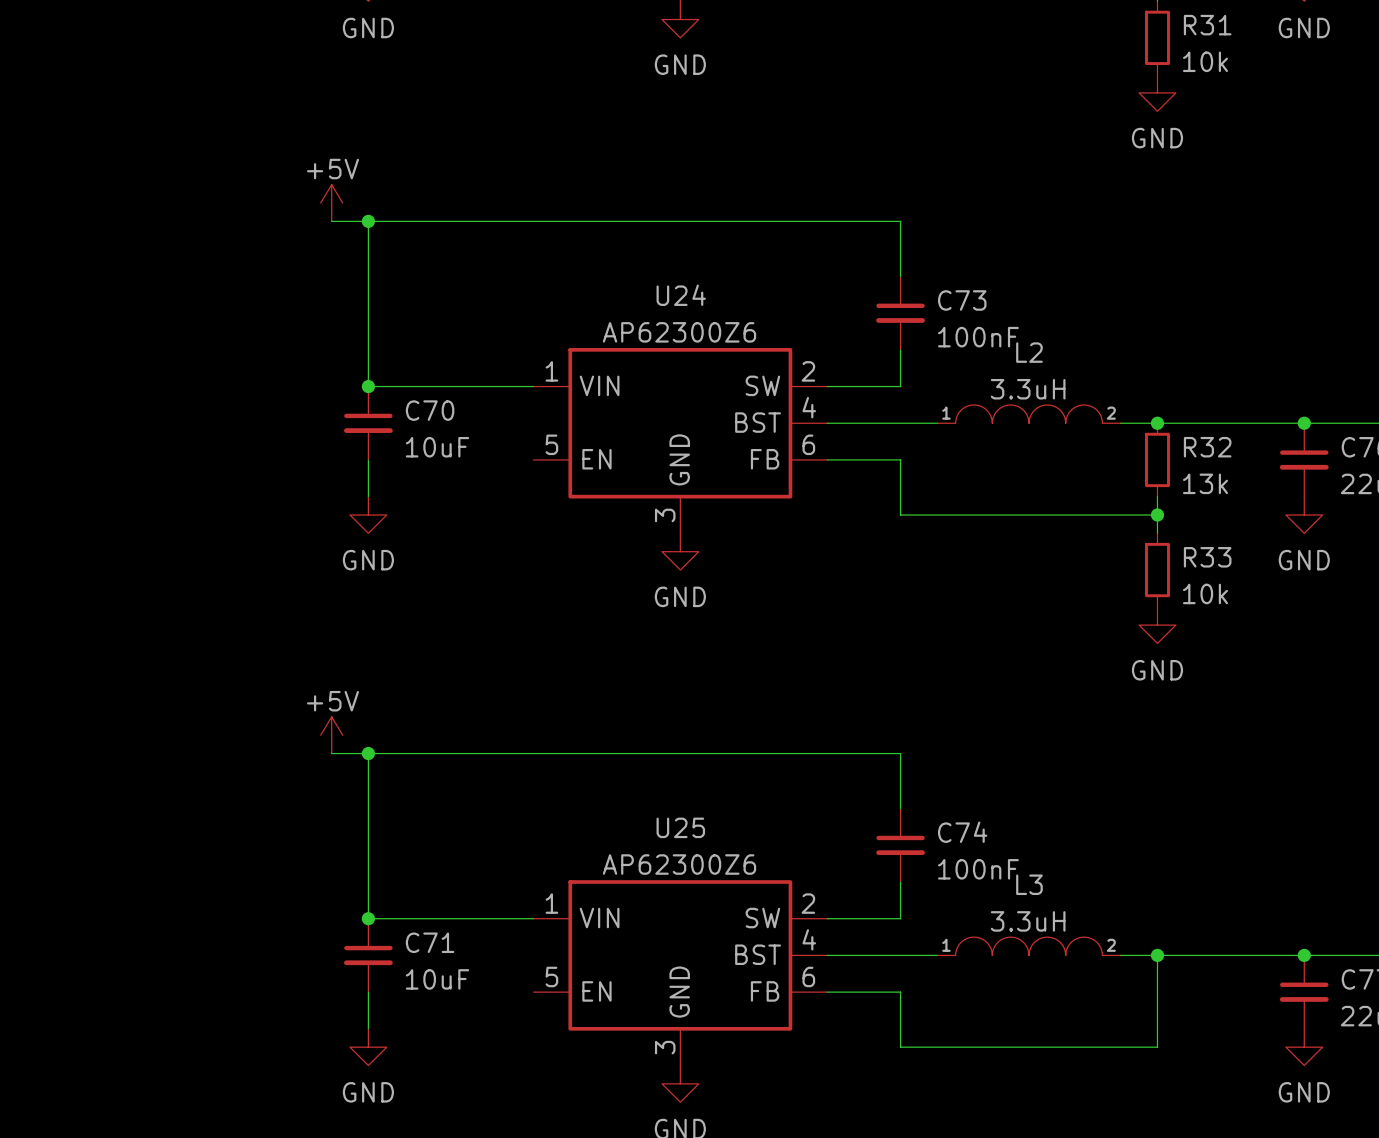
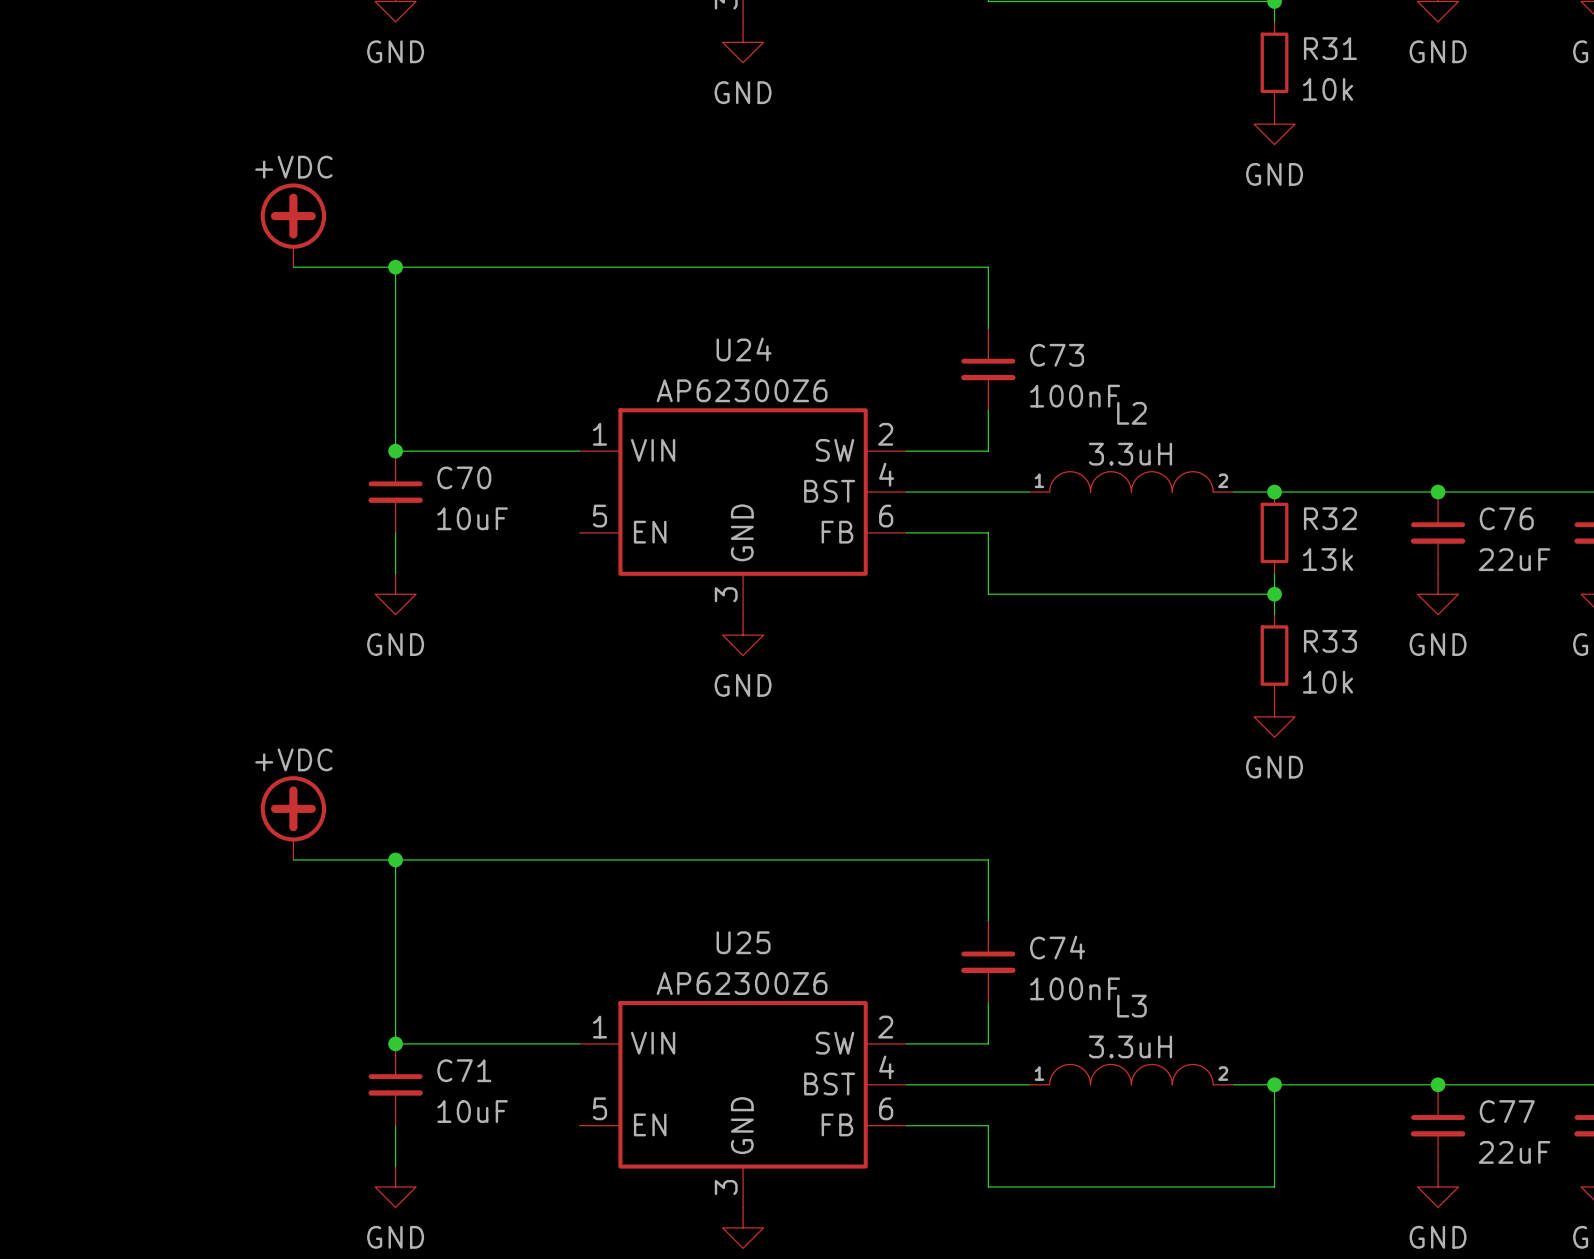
power symbol: none -> +VDC (293, 225)
power symbol: +5V (331, 203) -> none
wire: none -> (293, 267) (354, 267)
power symbol: none -> +VDC (293, 818)
power symbol: +5V (331, 735) -> none
wire: none -> (293, 859) (354, 859)

